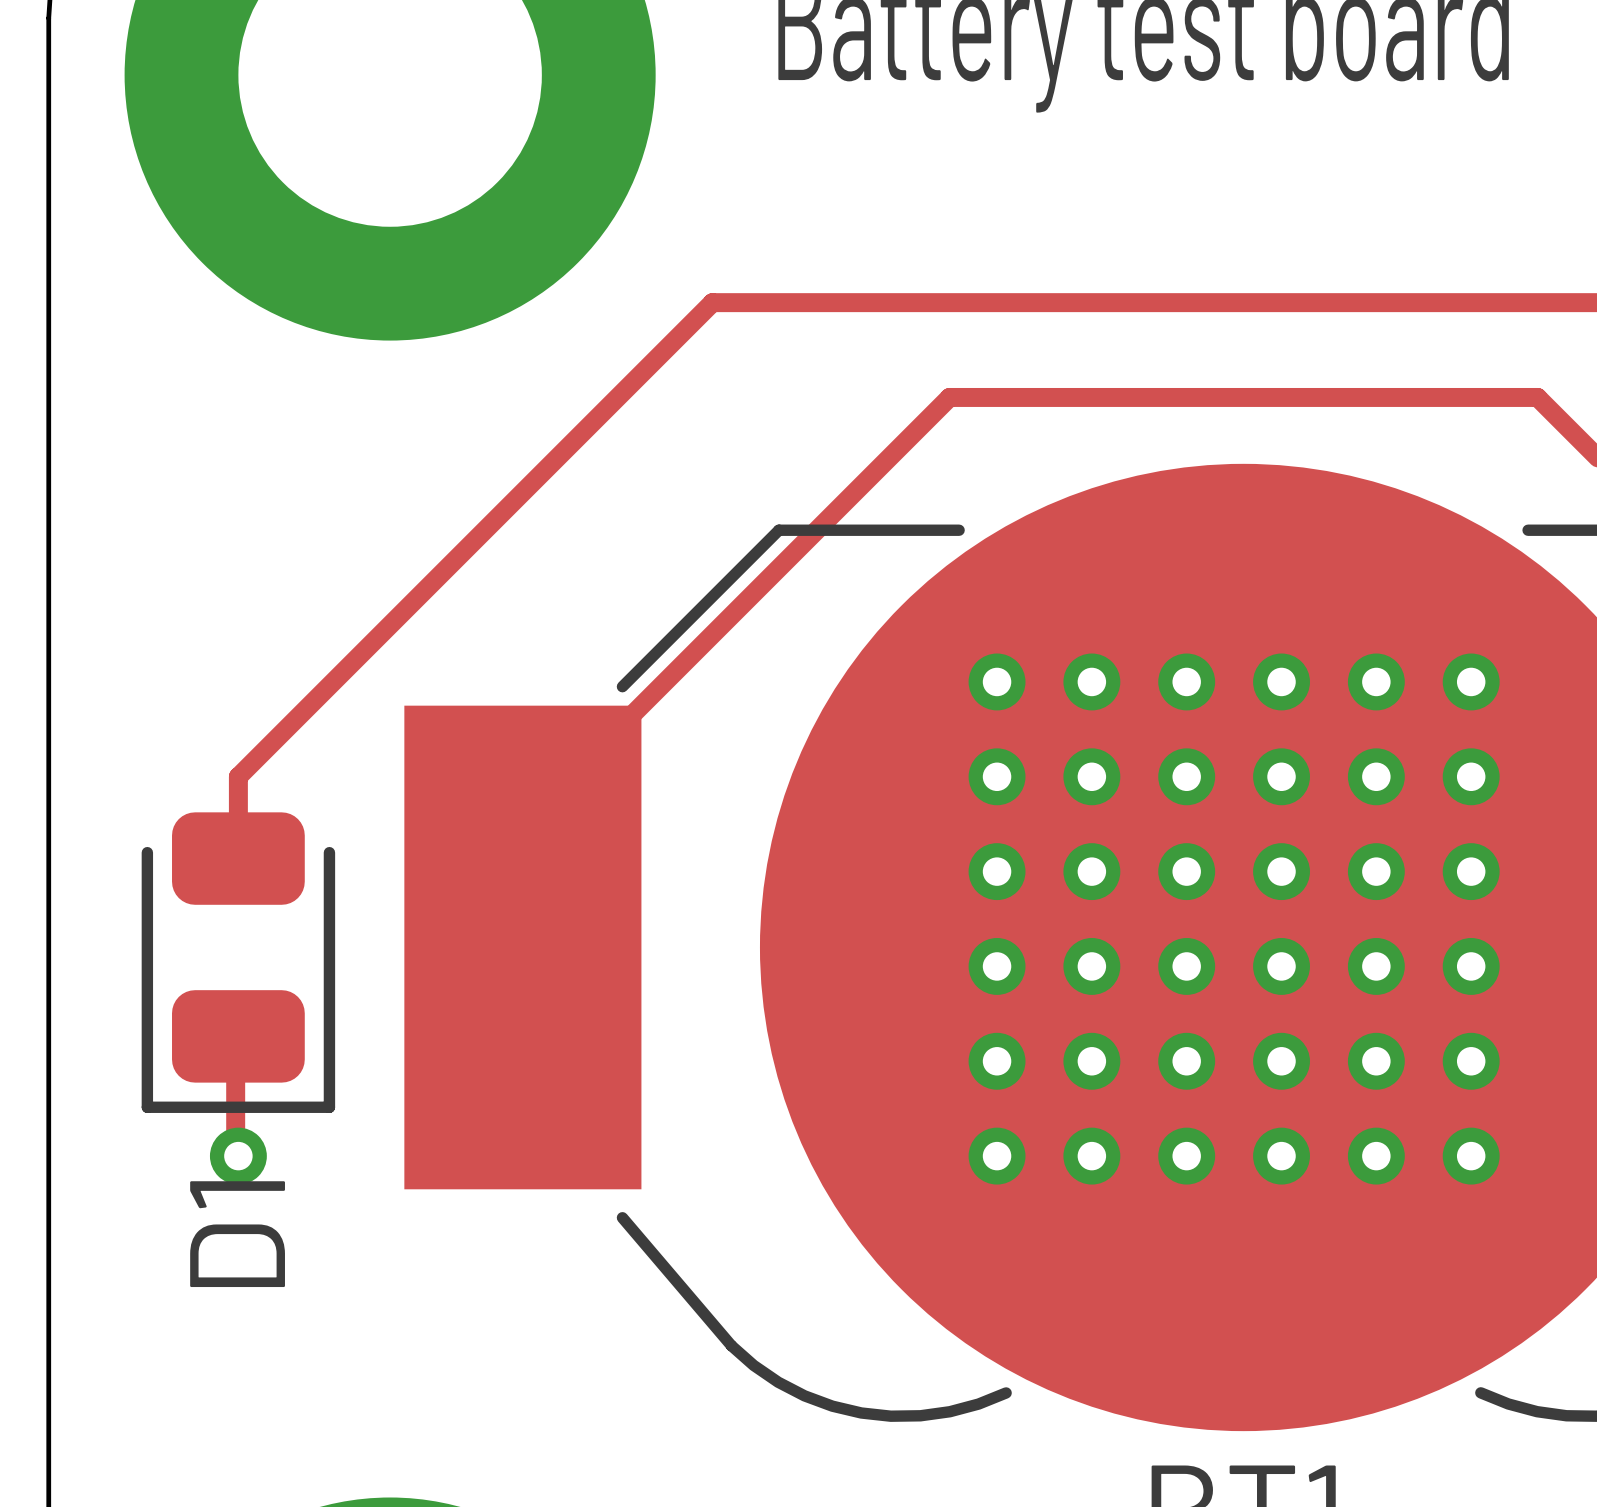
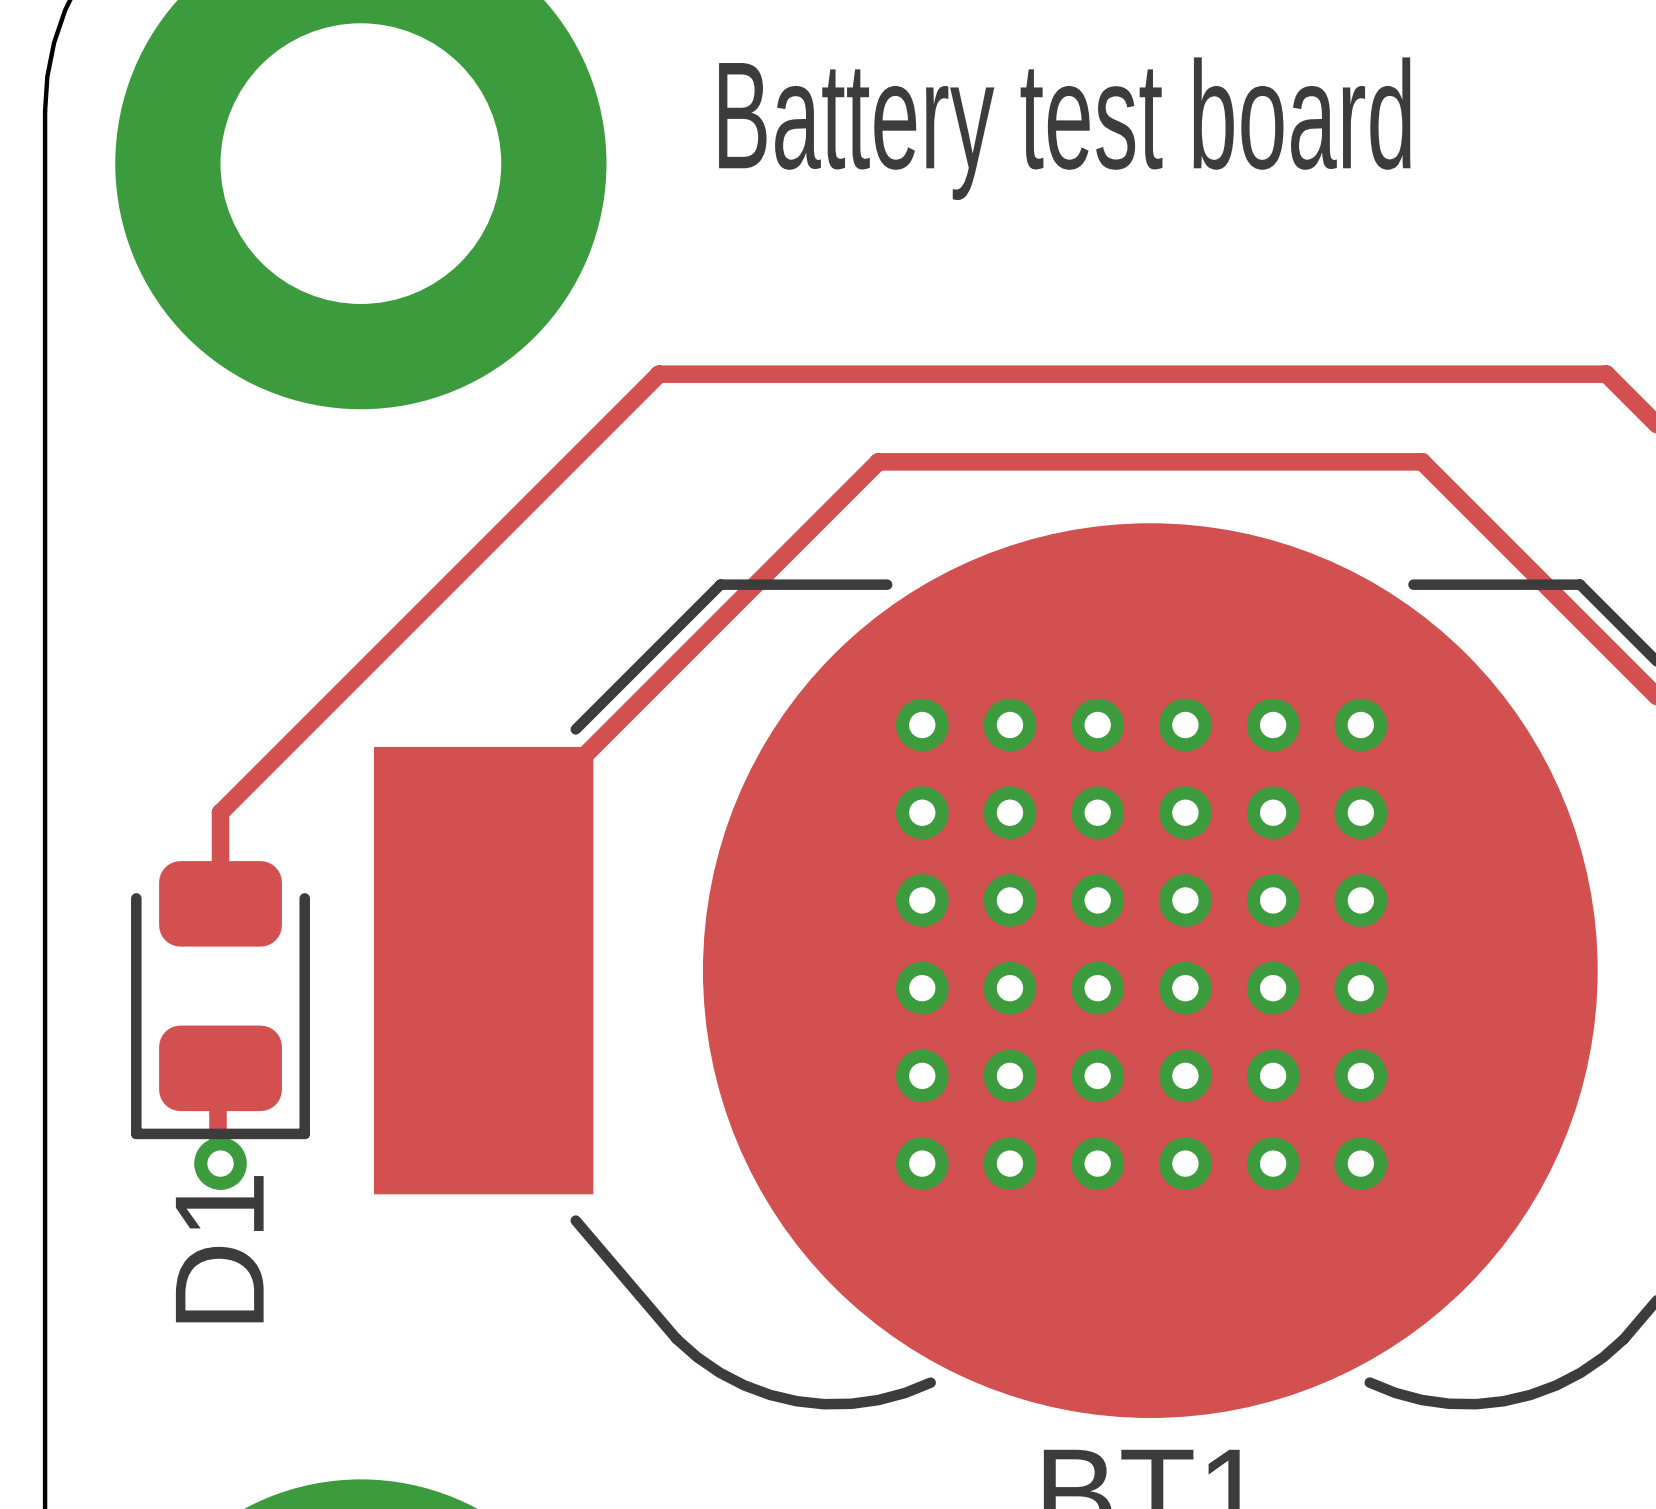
D1 position: (238, 962) -> (220, 1000)

